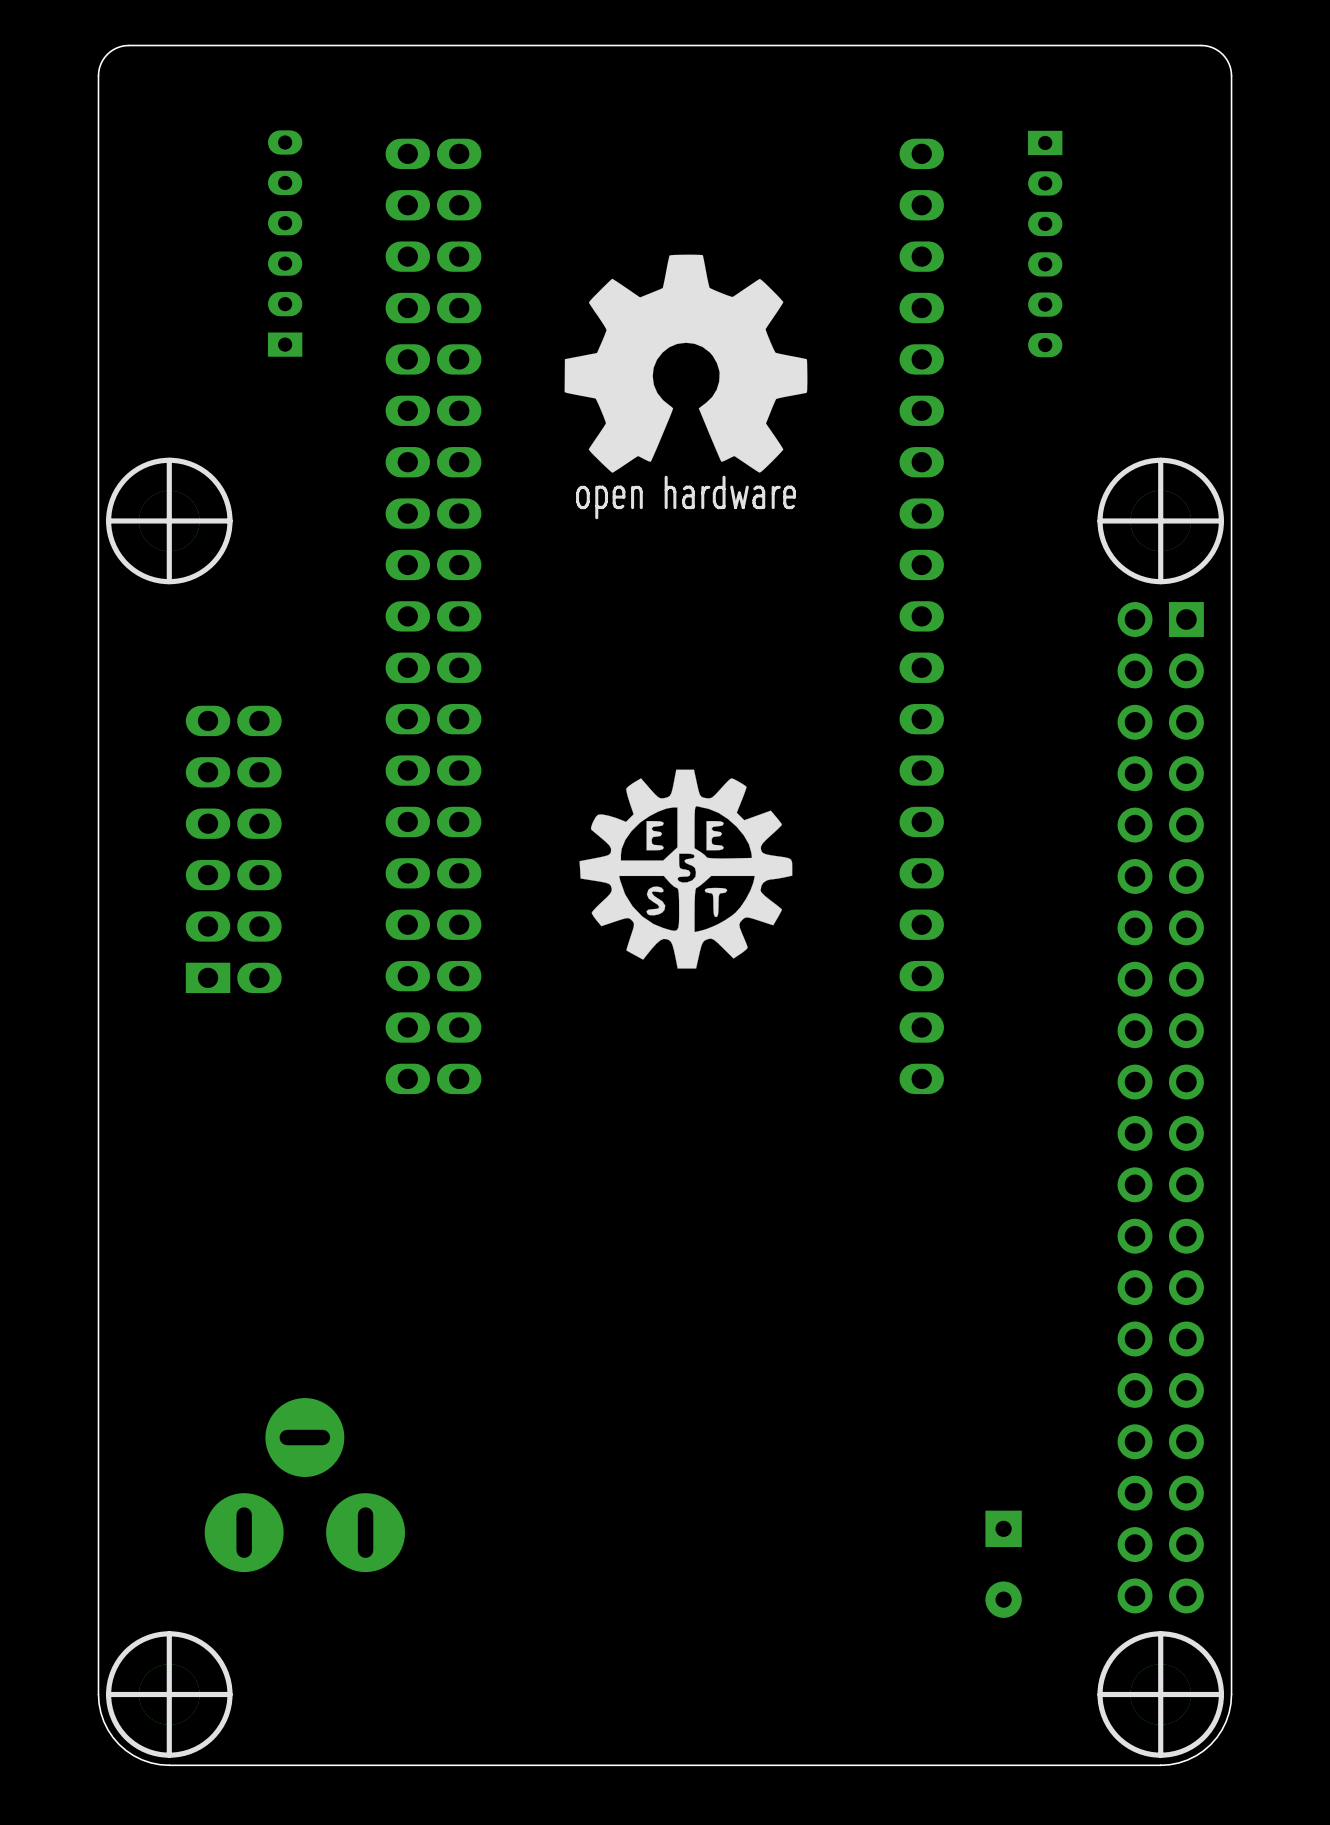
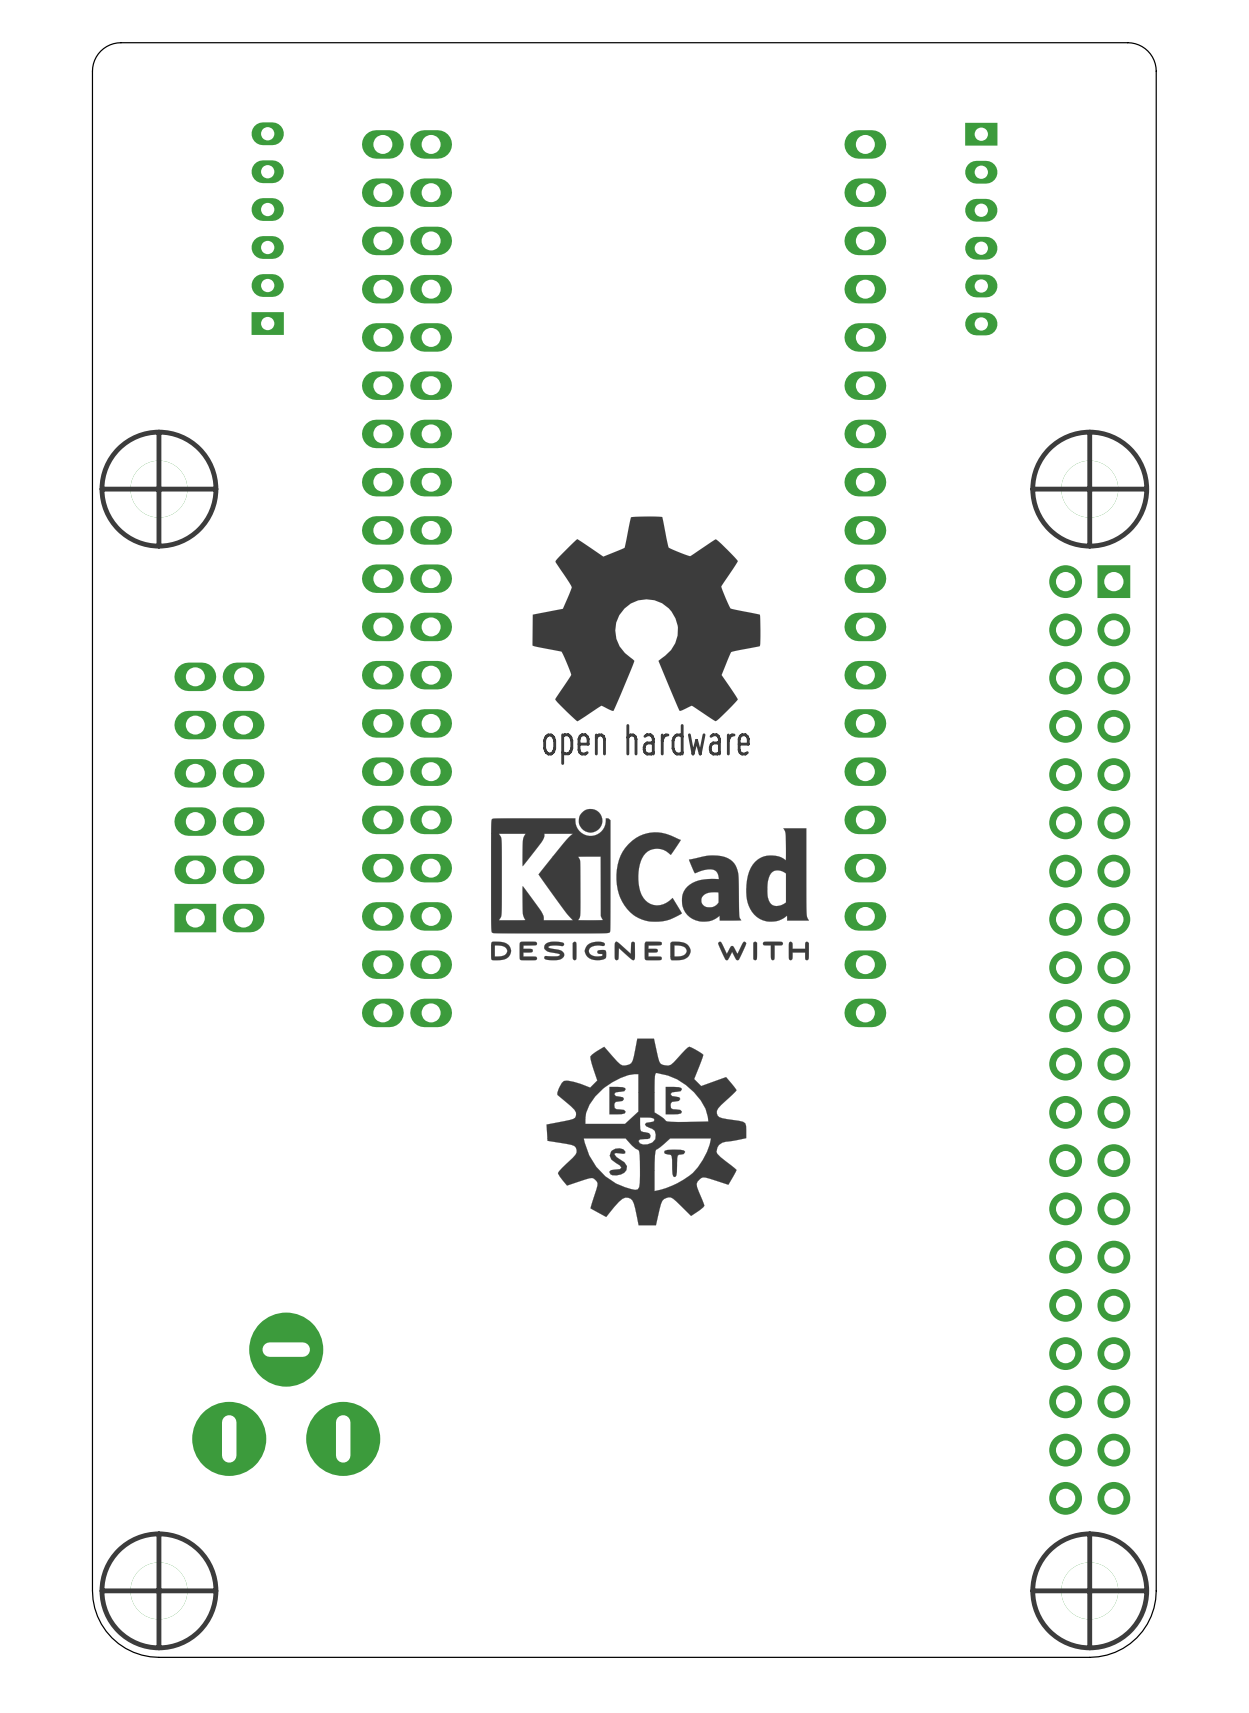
drawing position: (685, 386) -> (646, 640)
drawing: none -> [490, 808, 809, 961]
drawing position: (685, 869) -> (646, 1131)
part: (1003, 1564) -> none

